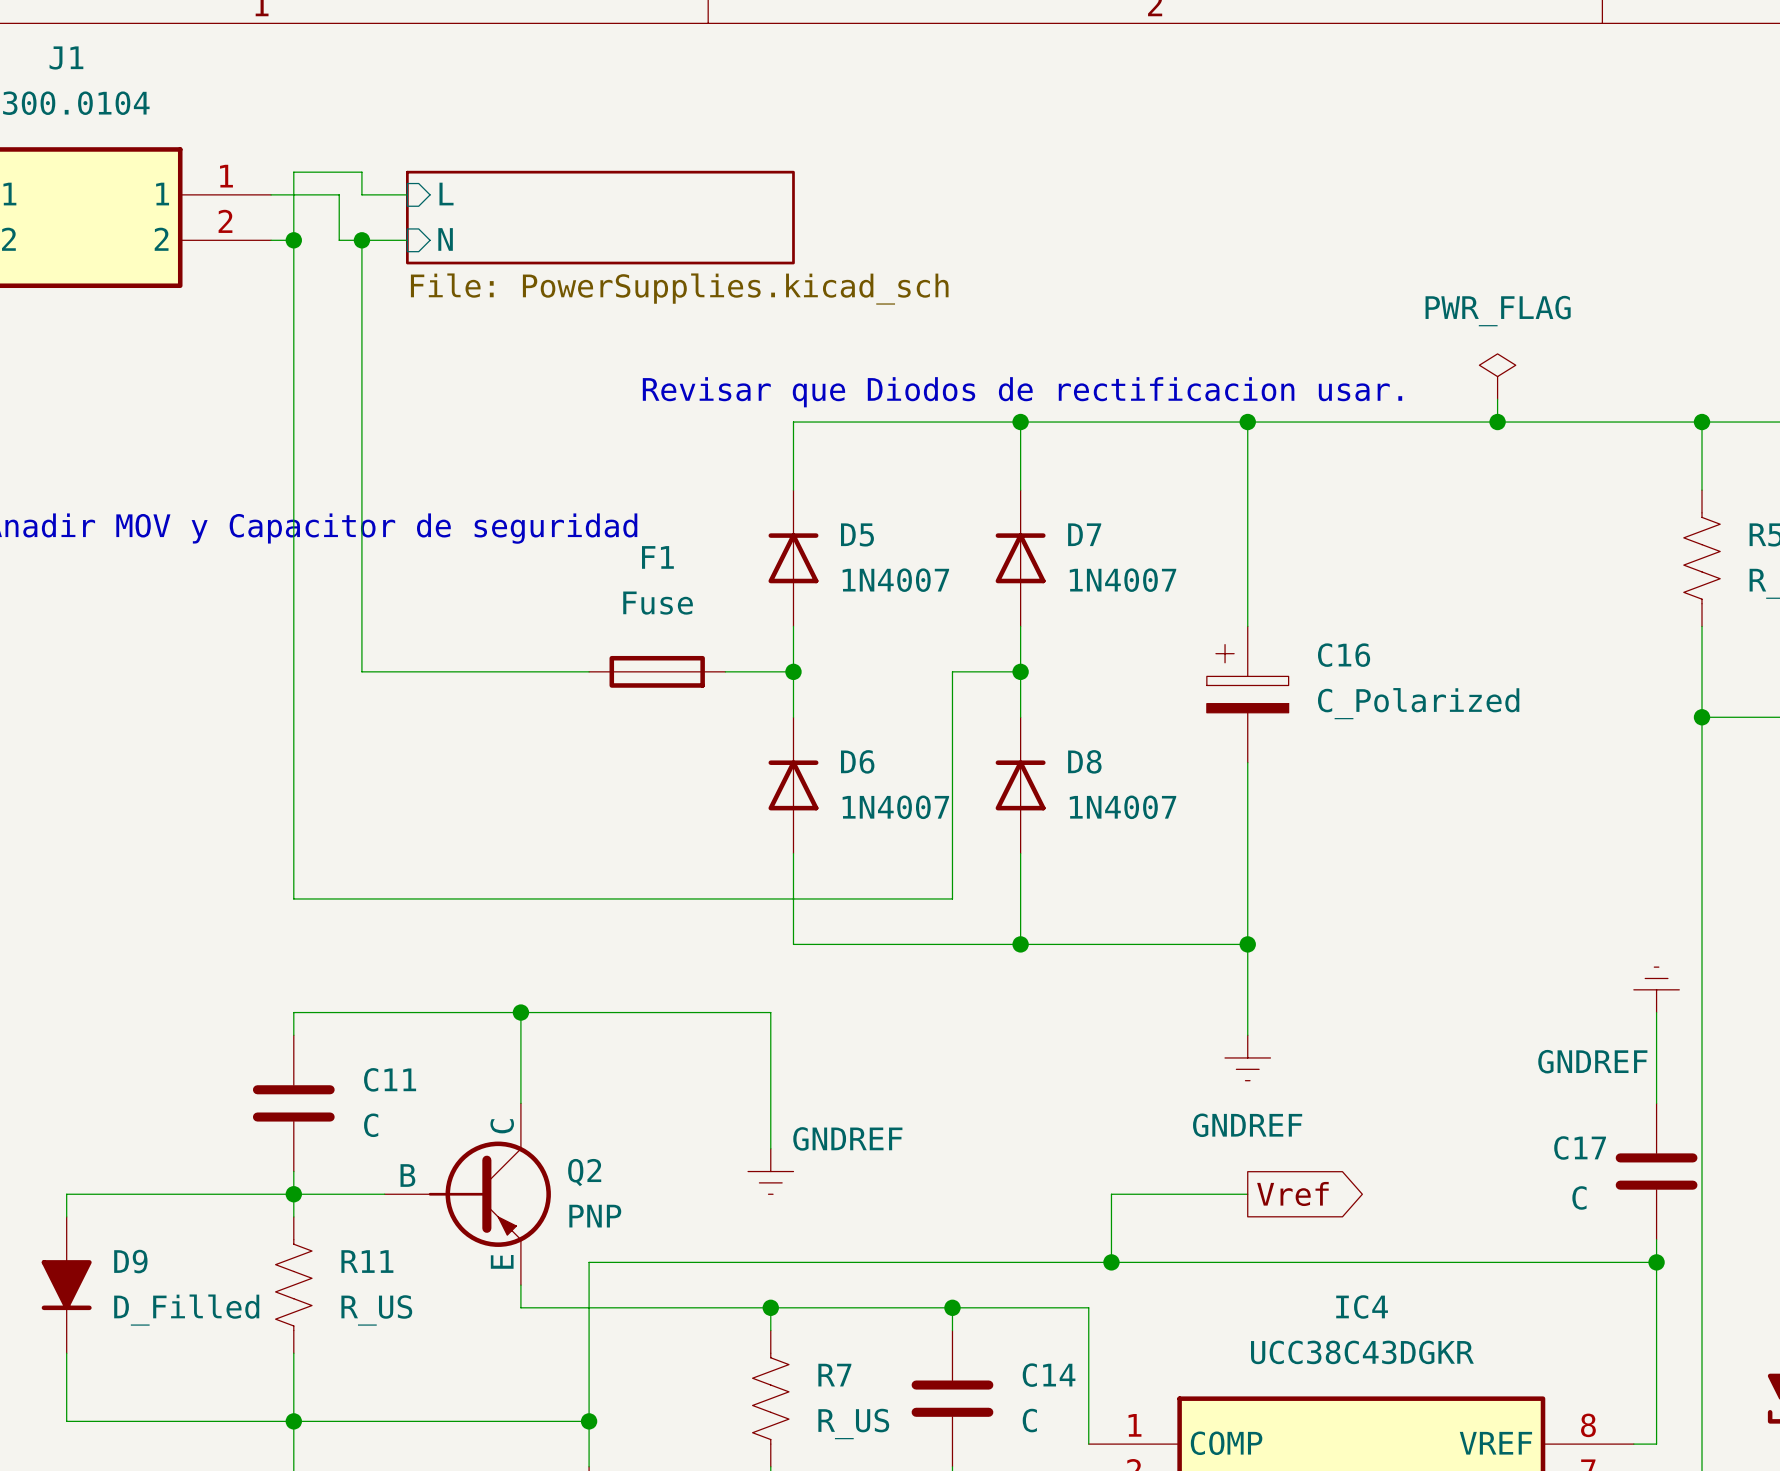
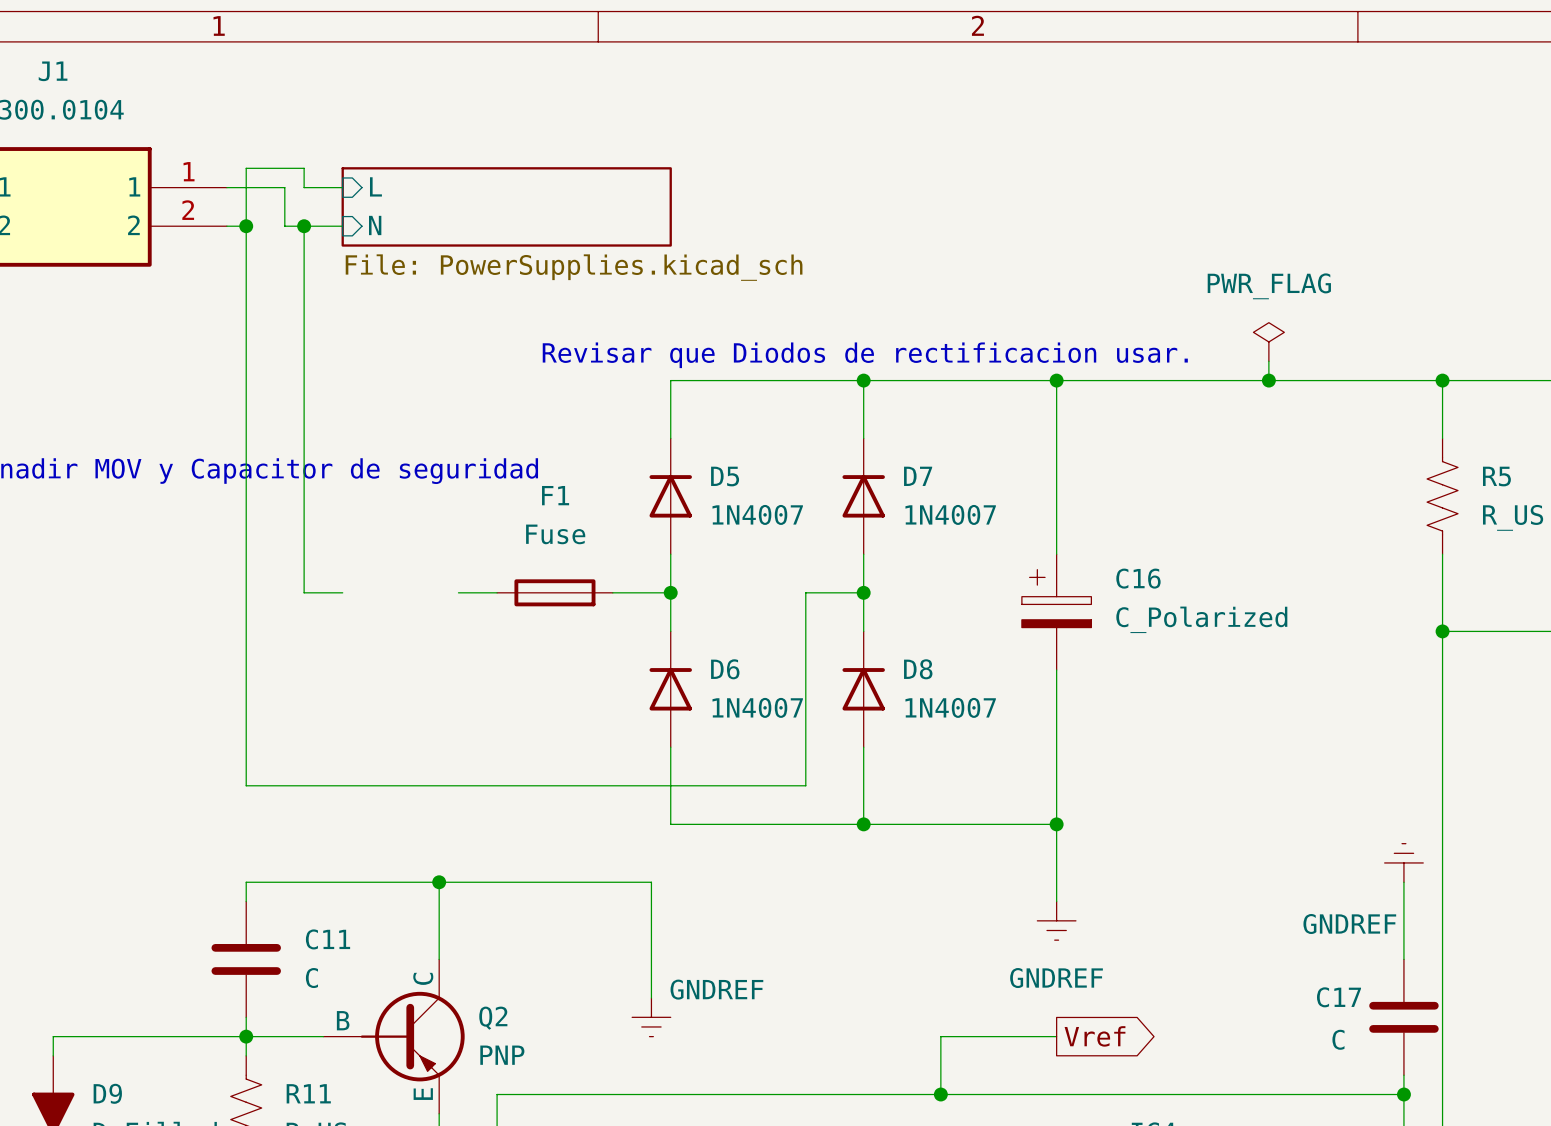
wire: (407, 671) (543, 671) -> none

